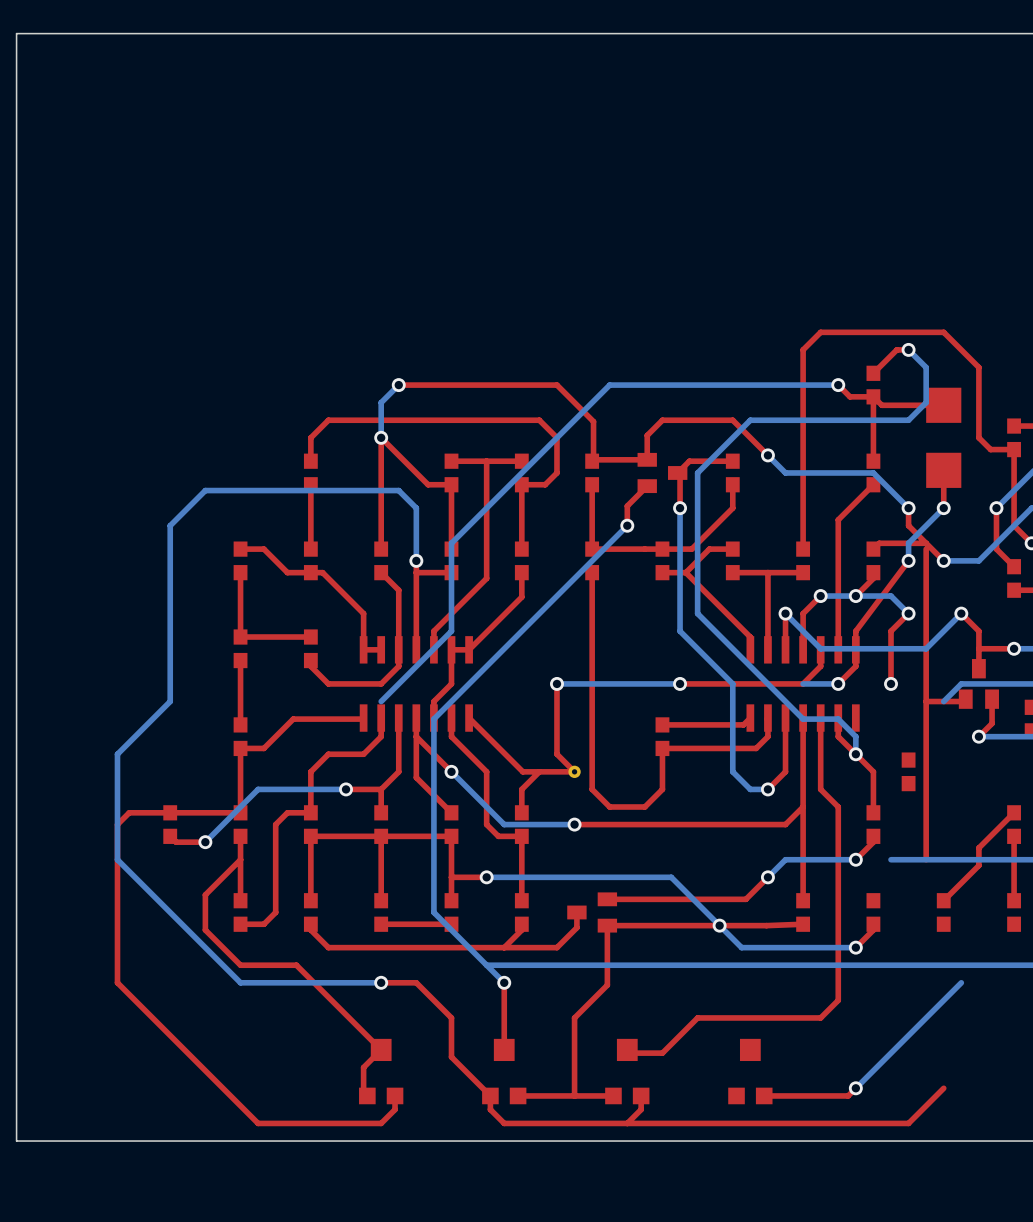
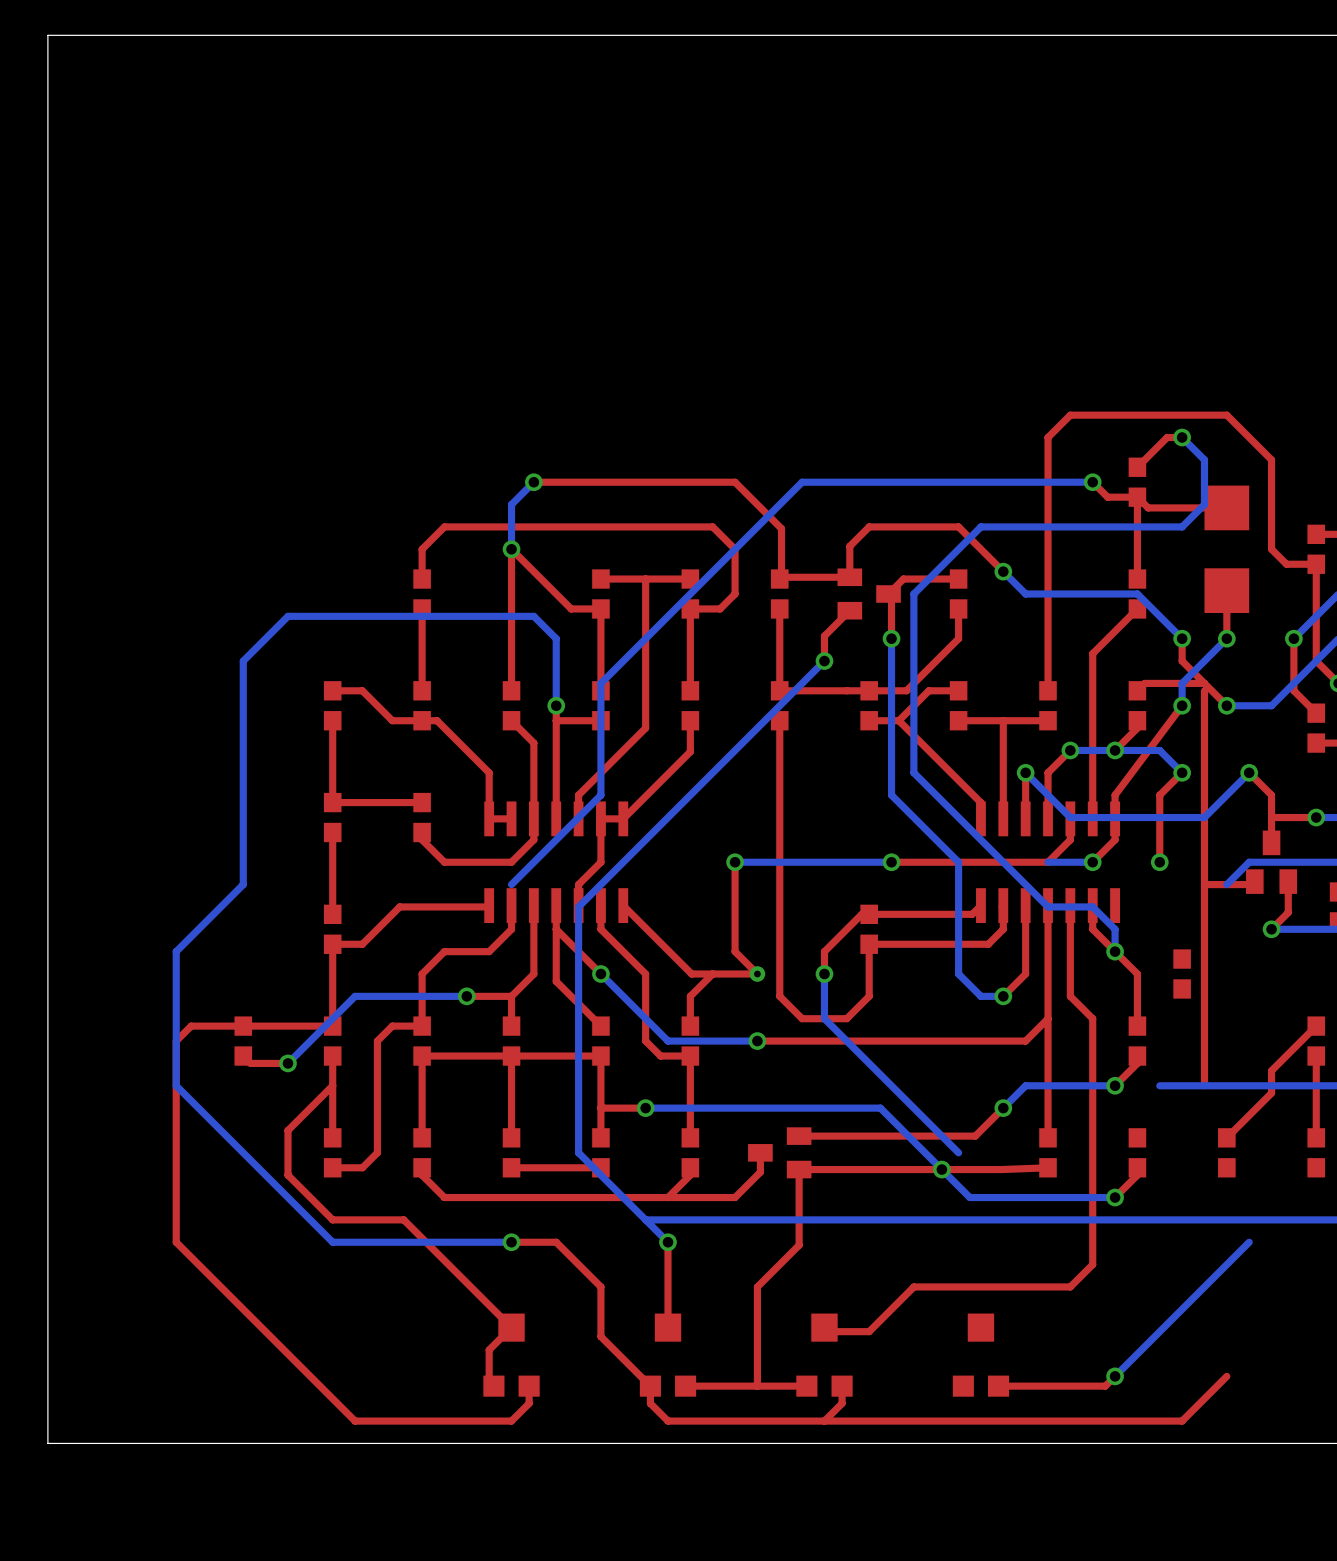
top track: none -> (869, 914) (861, 914) (824, 951) (824, 974)
bottom track: none -> (824, 974) (824, 1018) (958, 1152)
via: none -> (824, 974)

